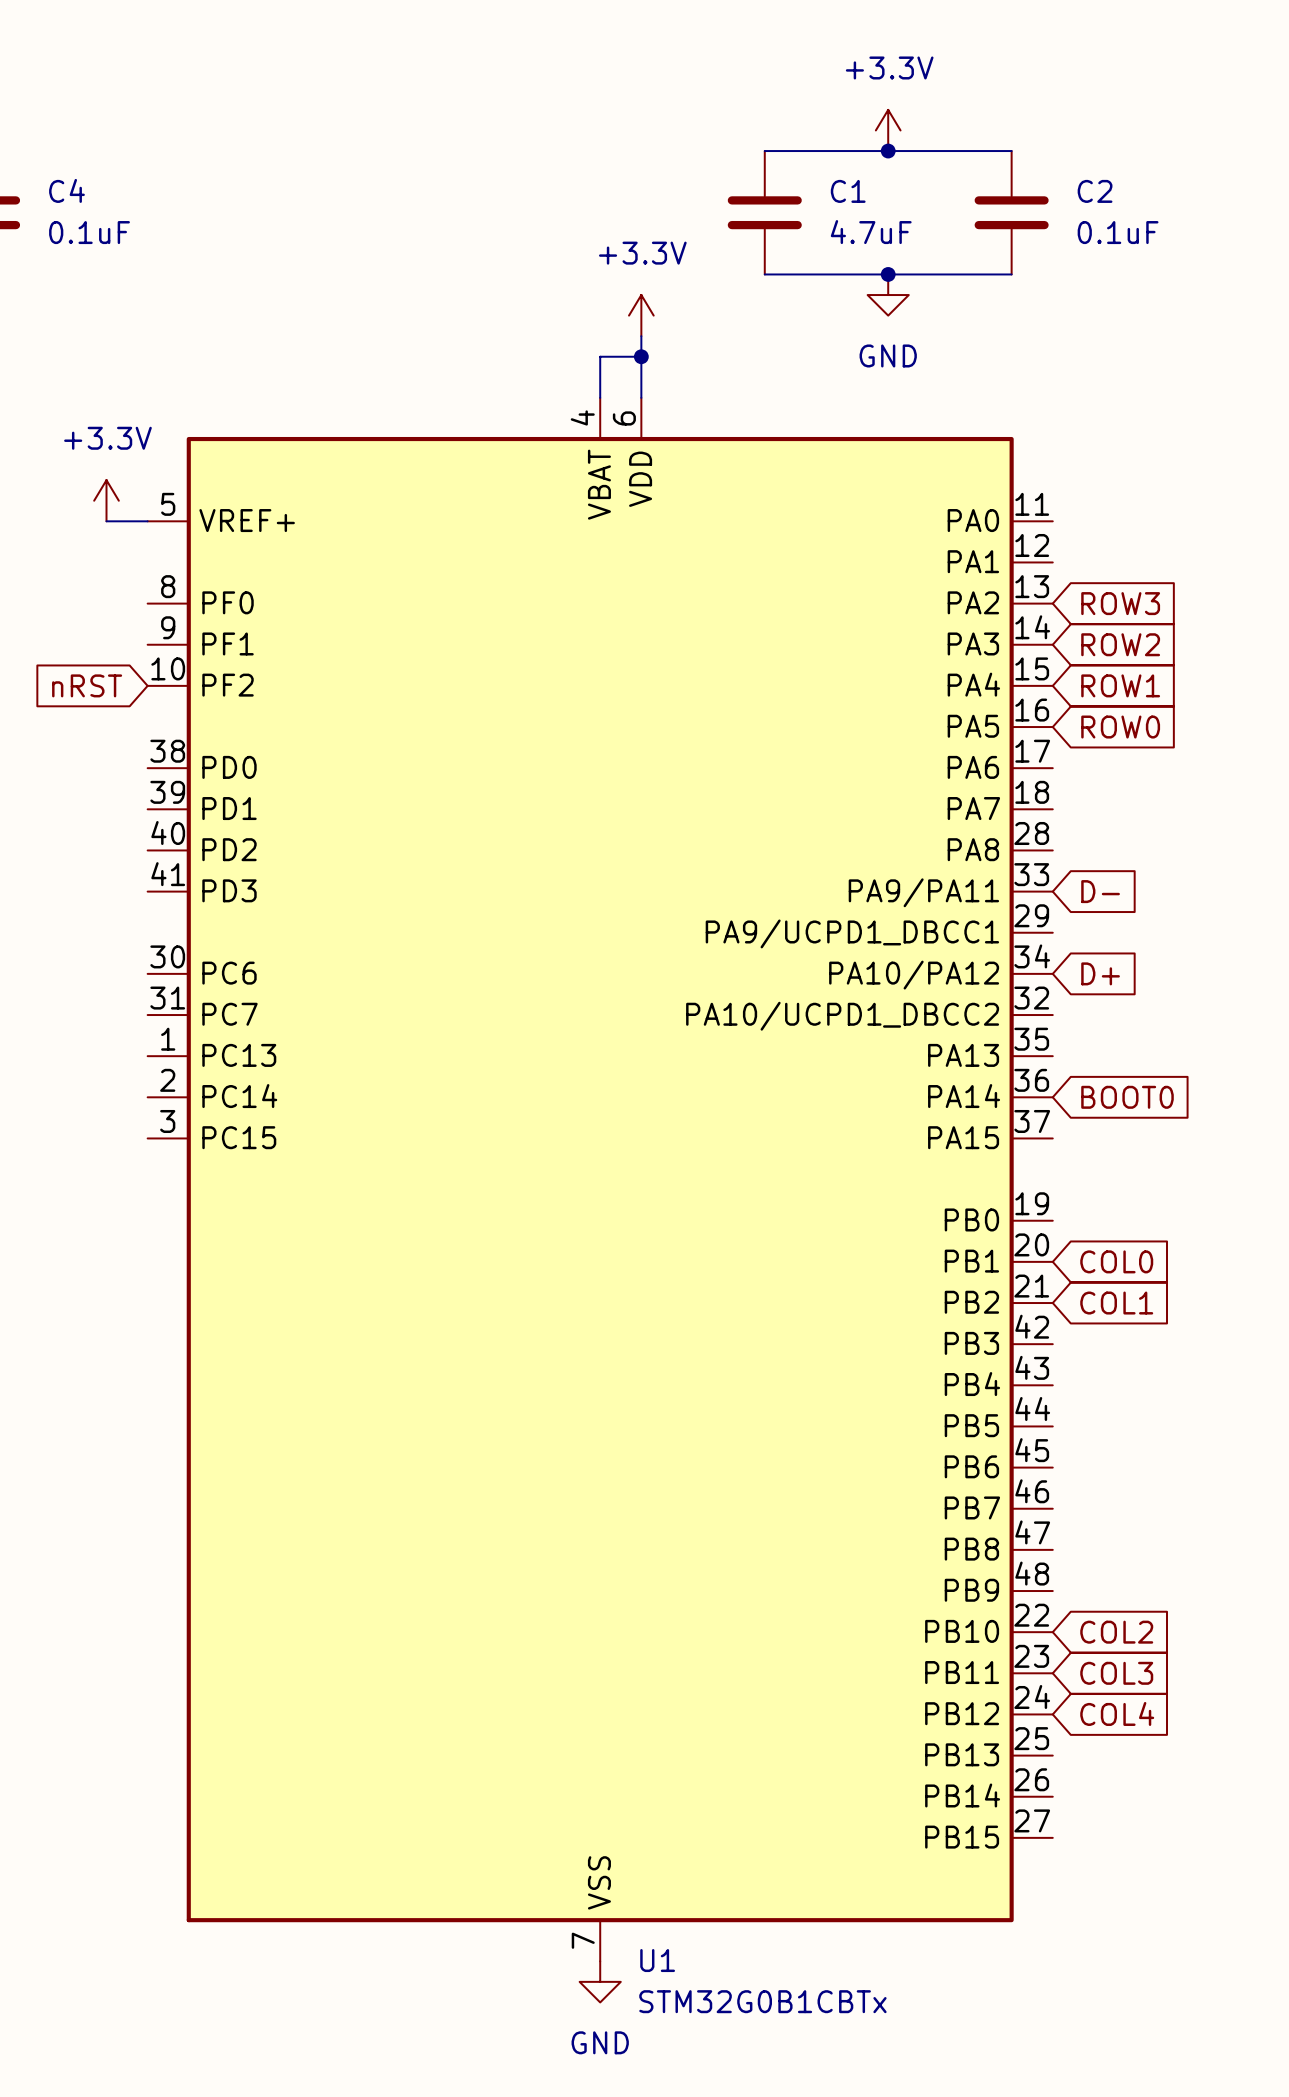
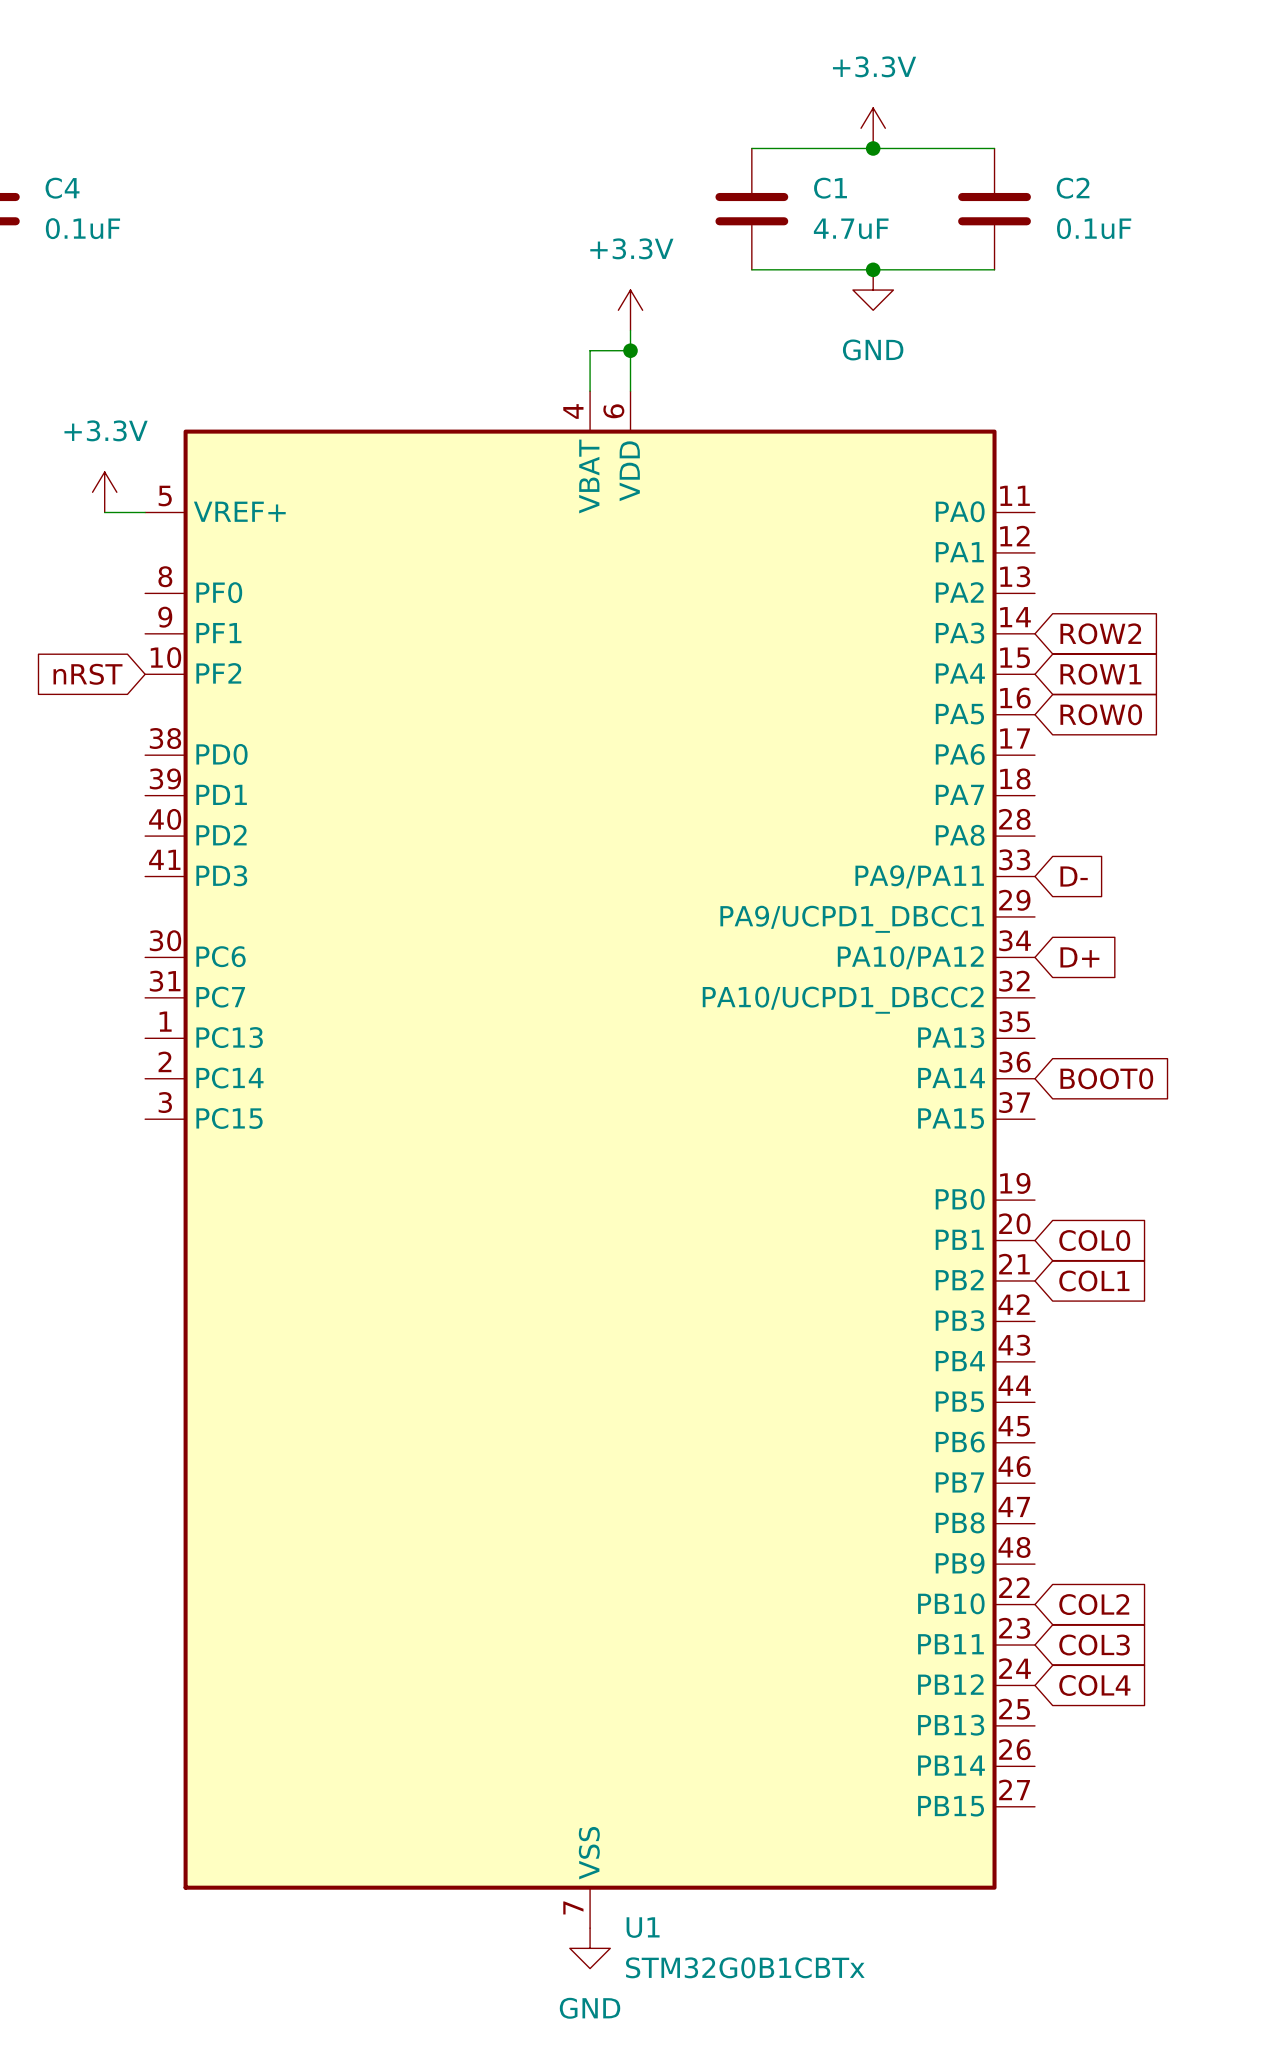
global label: ROW3 (1120, 603) -> none

